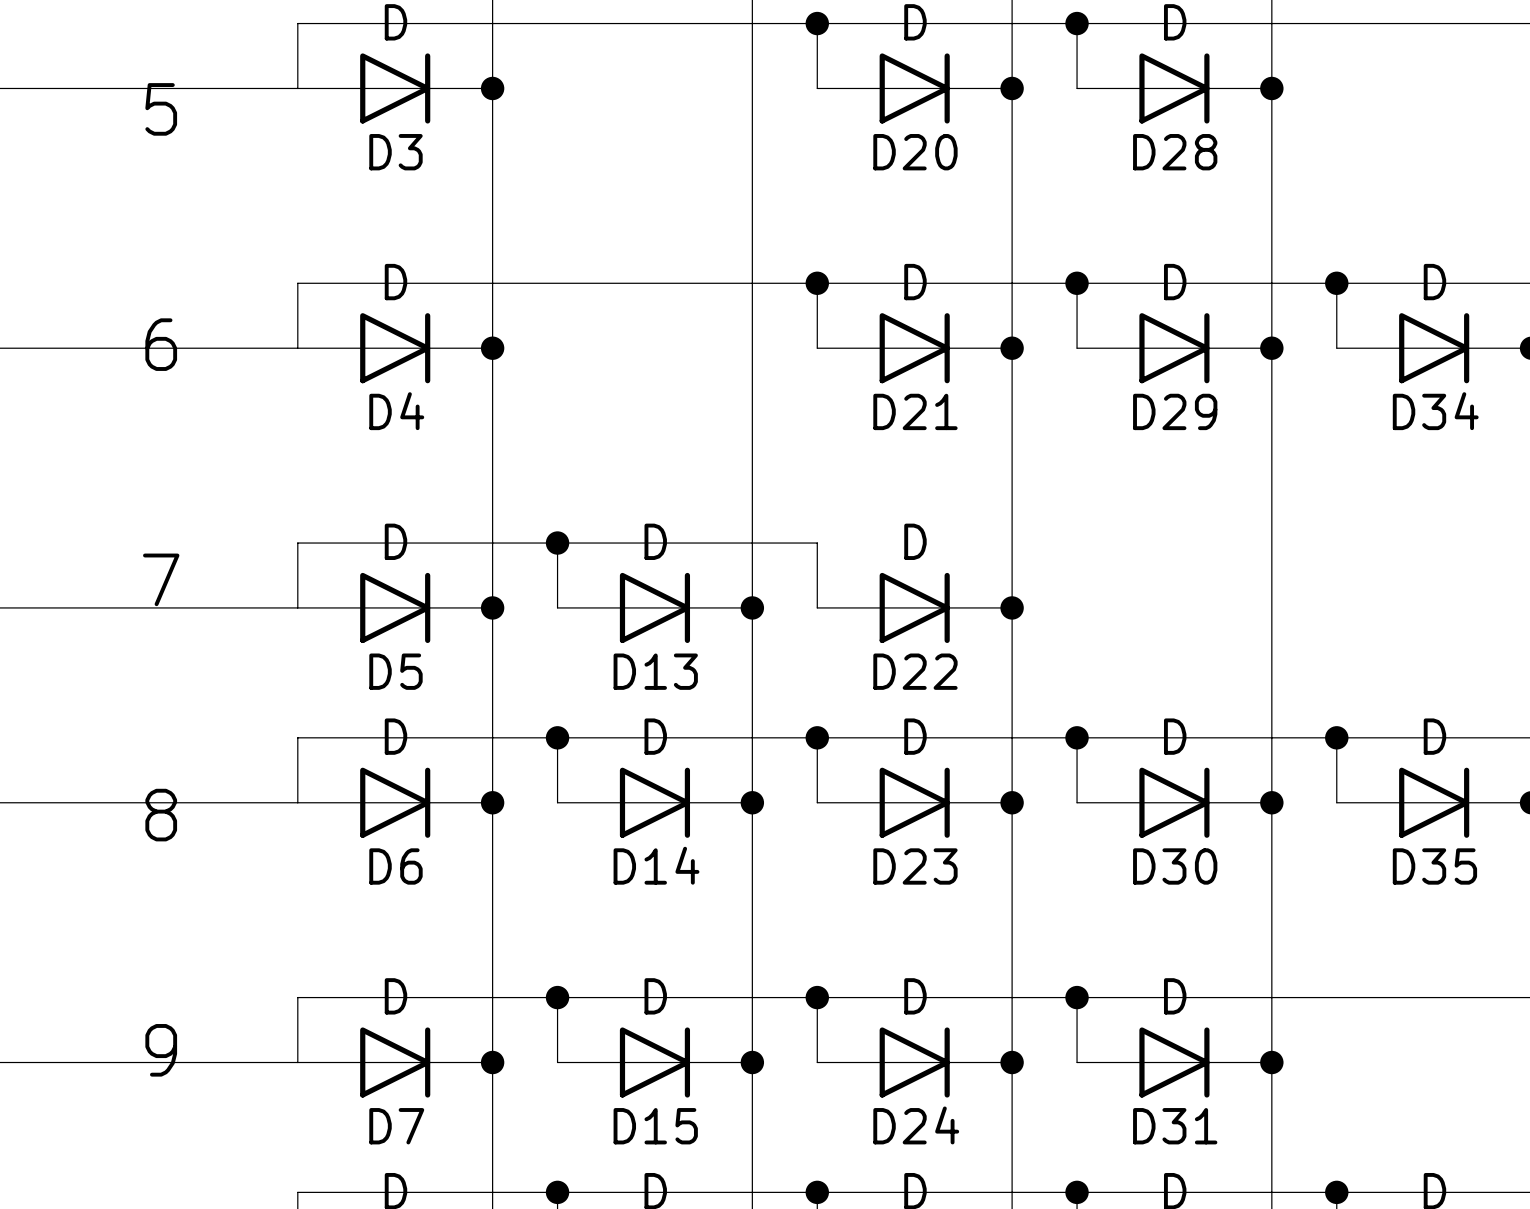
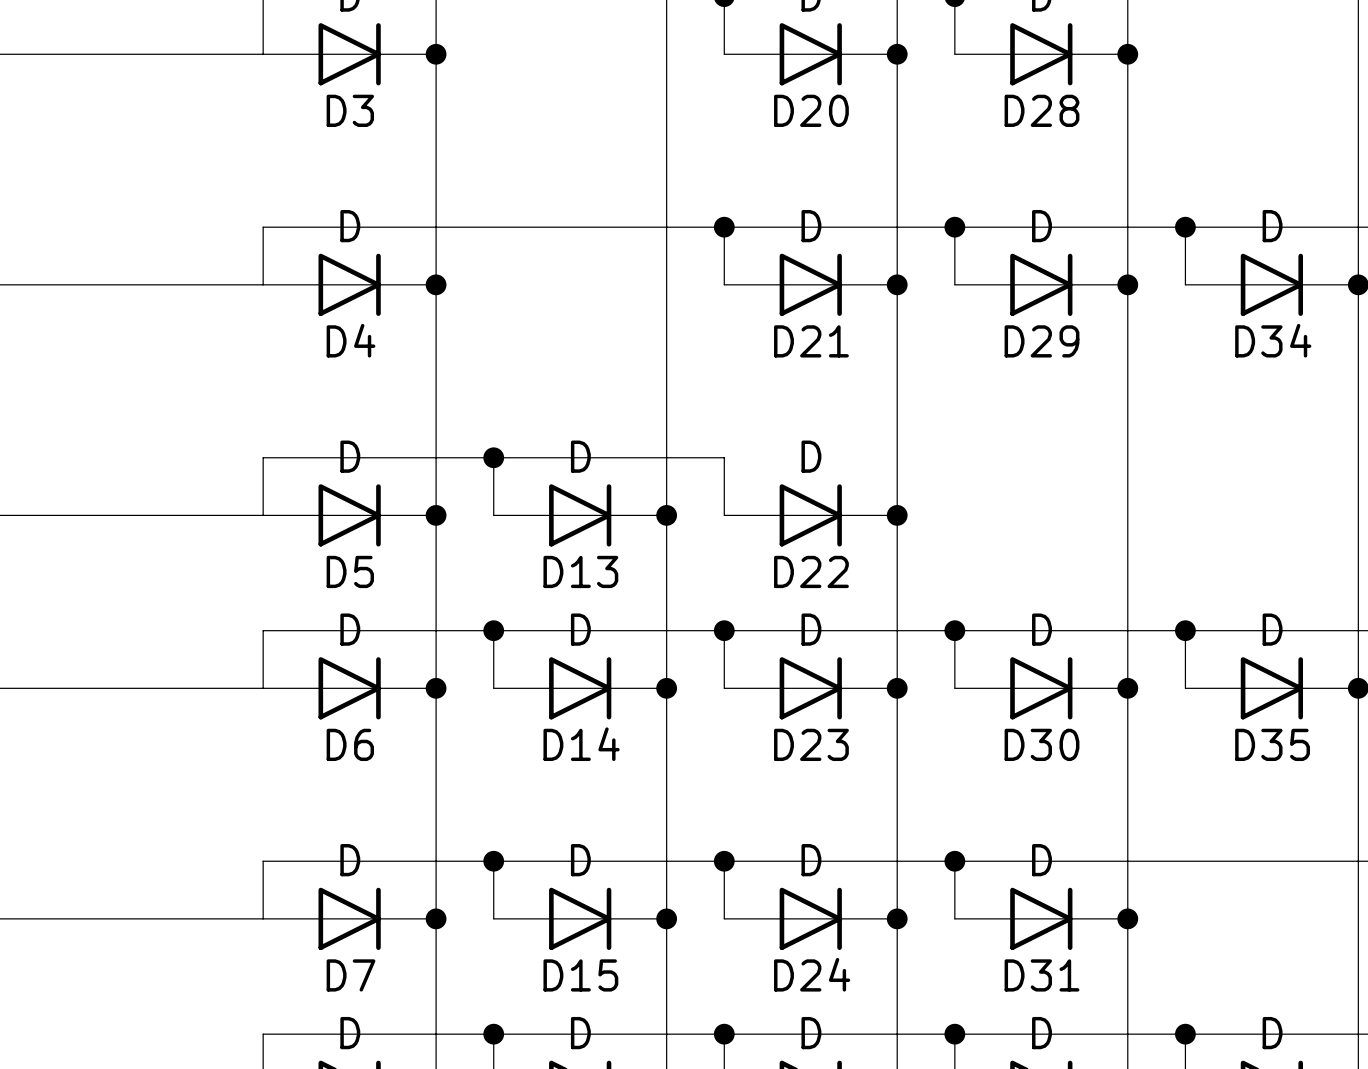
text: 5 (161, 109) -> none
text: 6 (161, 344) -> none
text: 7 (161, 579) -> none
text: 8 (161, 815) -> none
text: 9 (161, 1050) -> none

